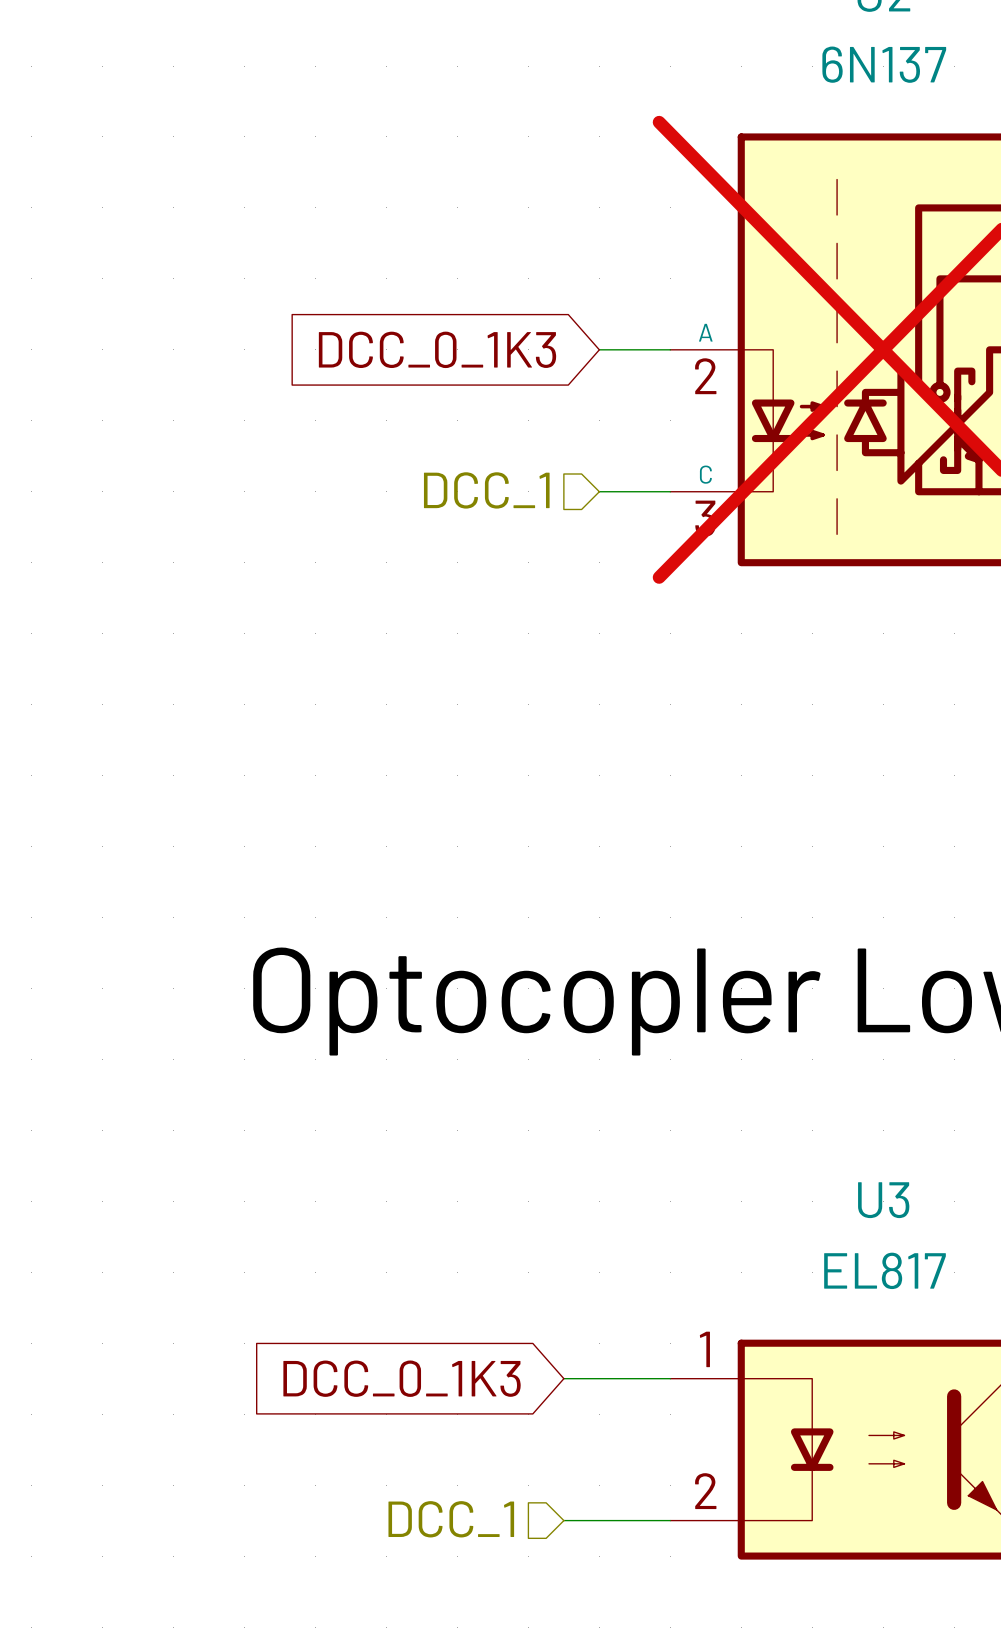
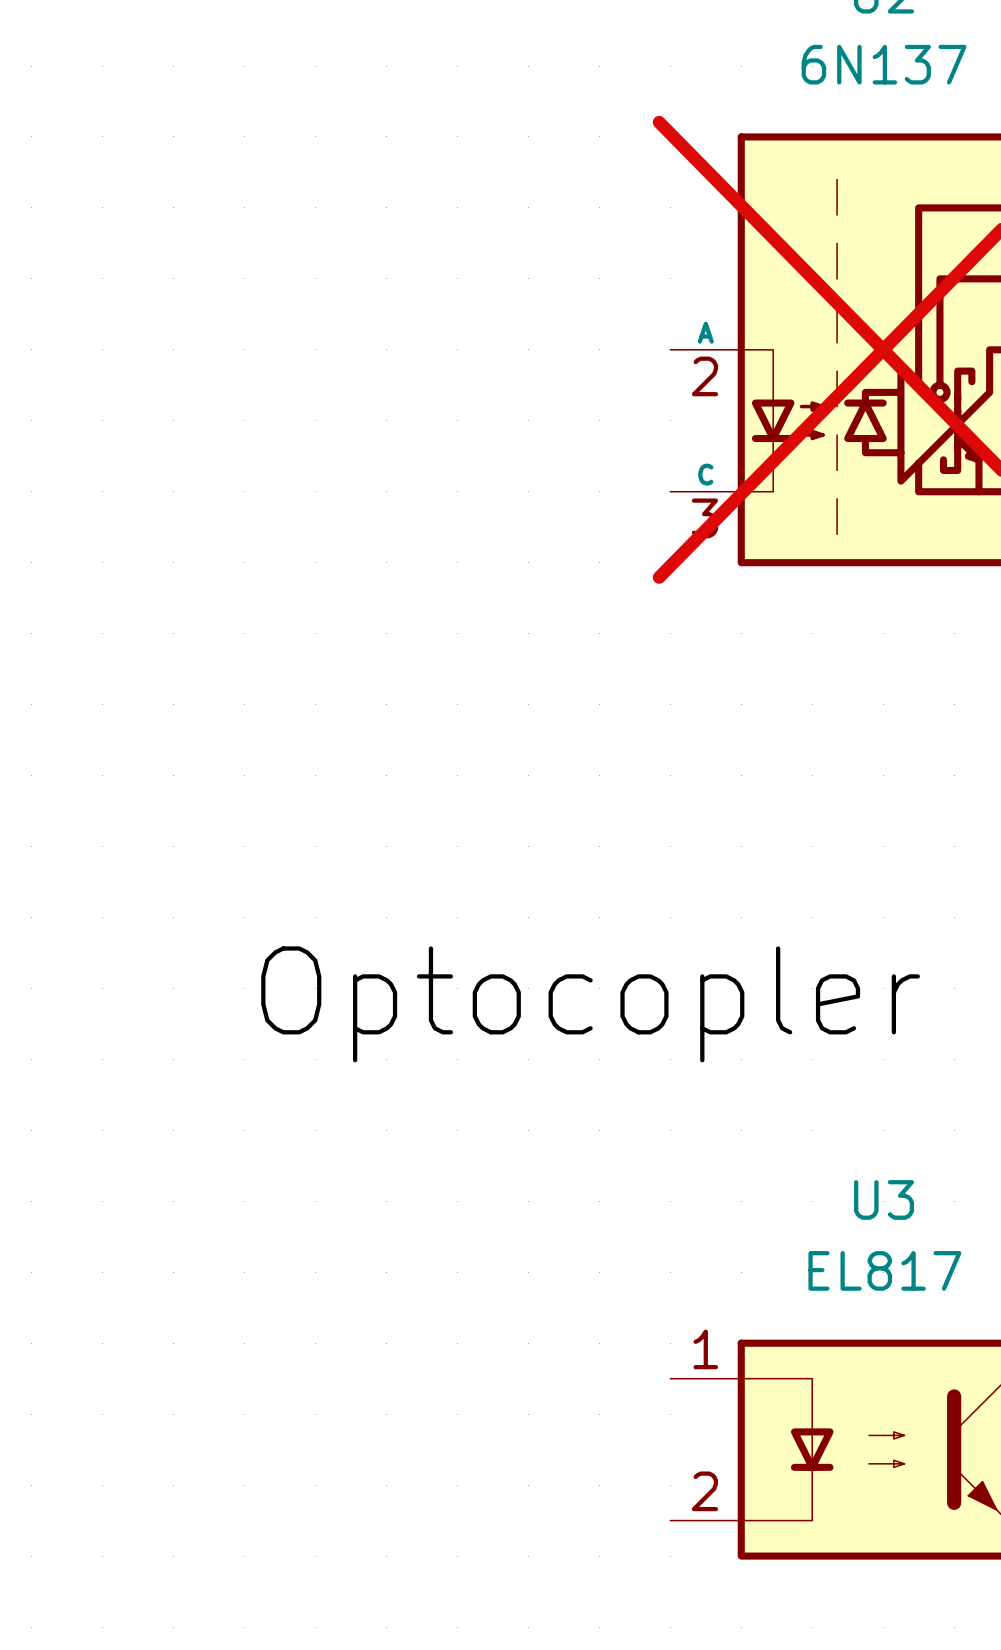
global label: DCC_0_1K3 (437, 349) -> none
wire: (599, 349) (670, 349) -> none
hierarchical label: DCC_1 (486, 490) -> none
wire: (599, 491) (670, 491) -> none
global label: DCC_0_1K3 (402, 1378) -> none
wire: (563, 1378) (670, 1378) -> none
hierarchical label: DCC_1 (451, 1519) -> none
wire: (563, 1520) (670, 1520) -> none

